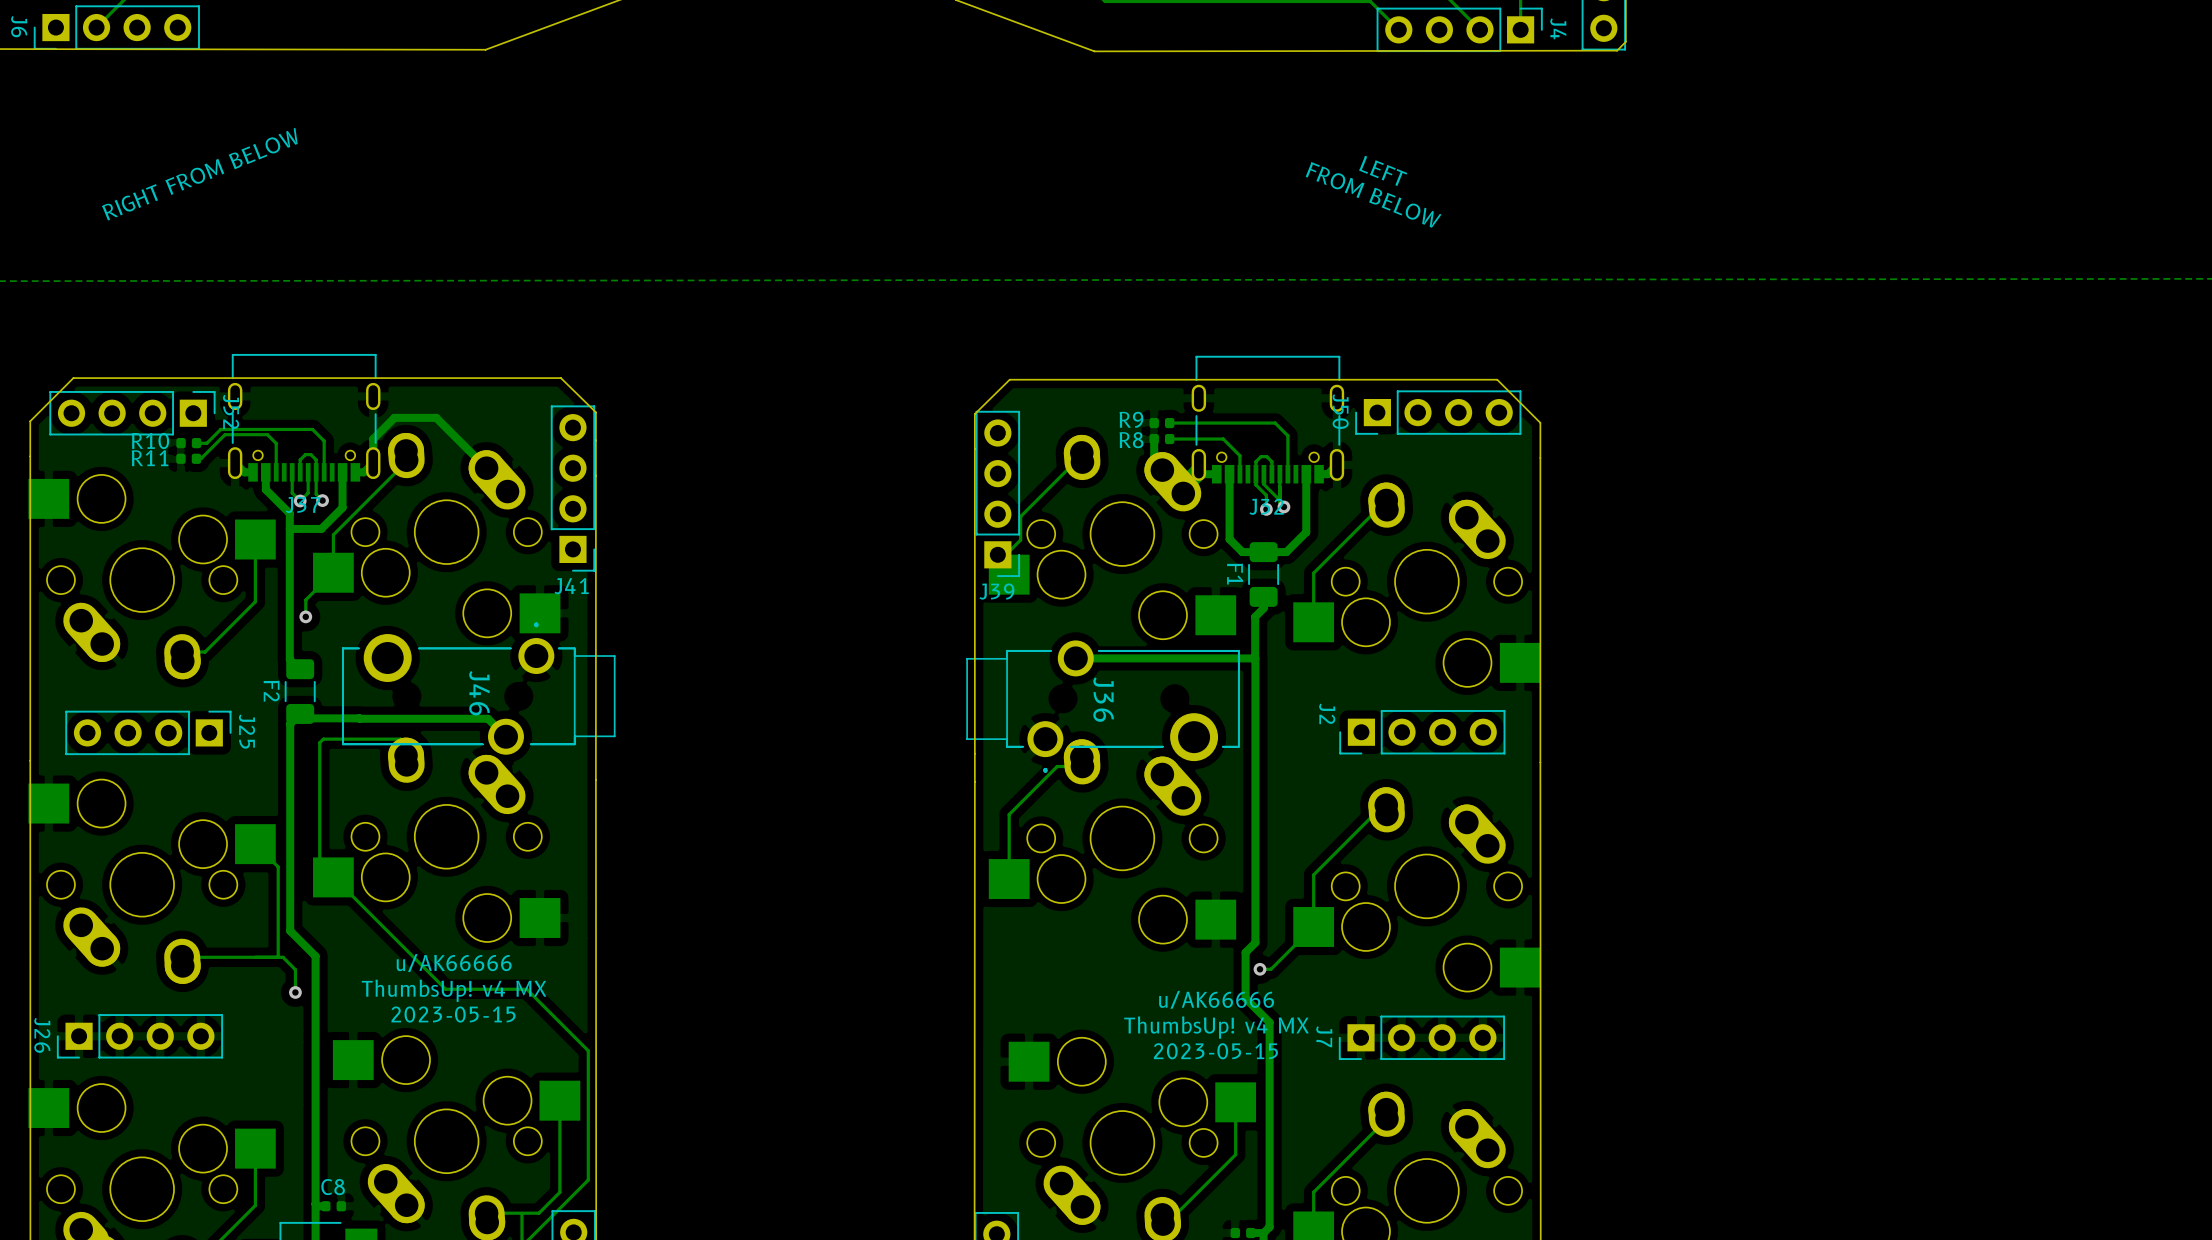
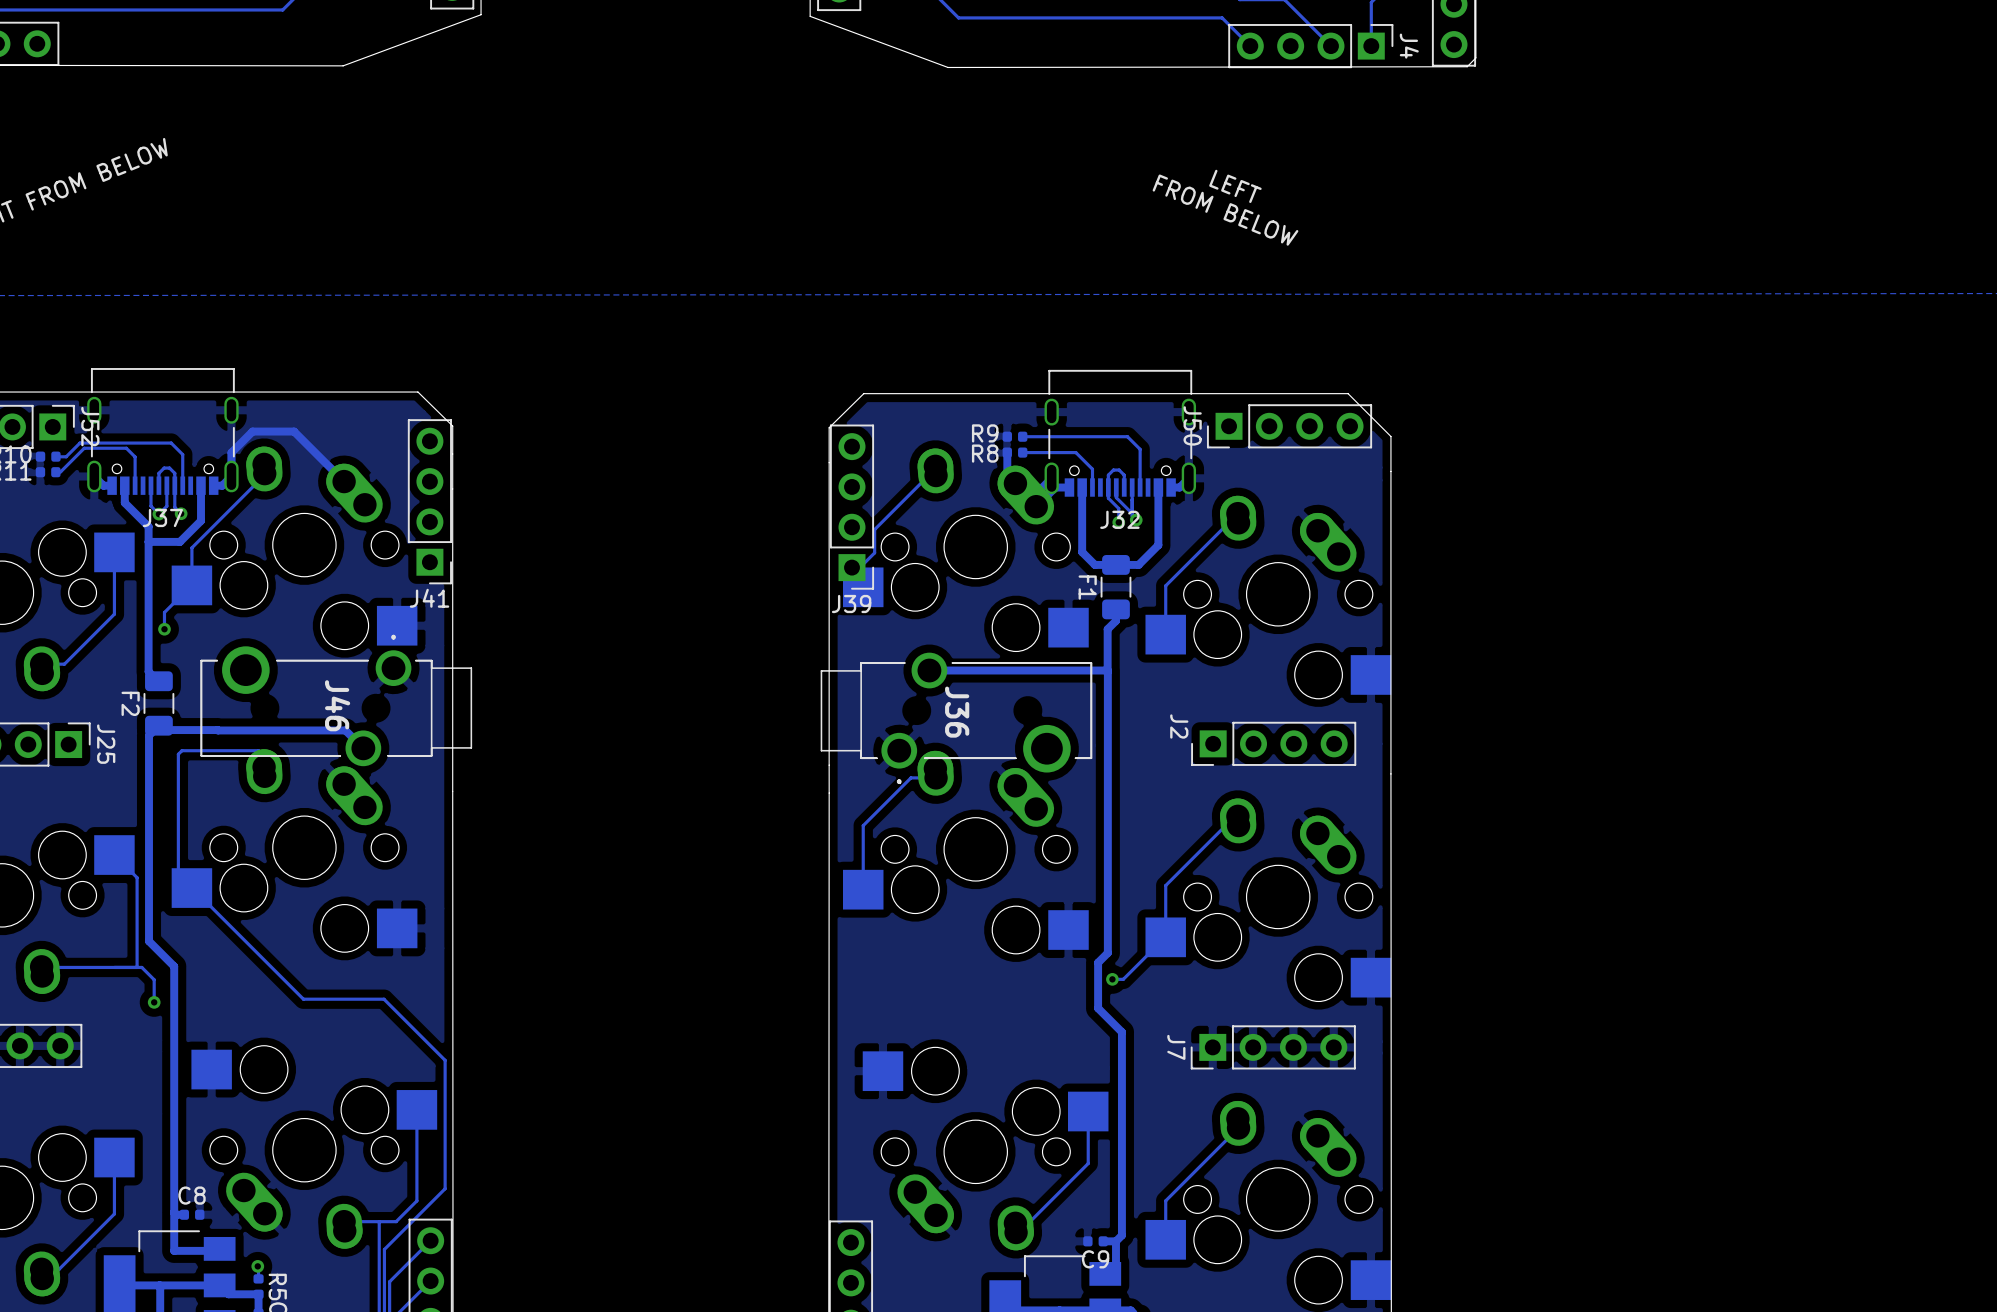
text: u/AK66666 (454, 963) -> none
text: ThumbsUp! v4 MX (454, 990) -> none
text: u/AK66666 (1216, 999) -> none
text: 2023-05-15 (453, 1014) -> none
text: ThumbsUp! v4 MX (1216, 1027) -> none
text: 2023-05-15 (1215, 1051) -> none

